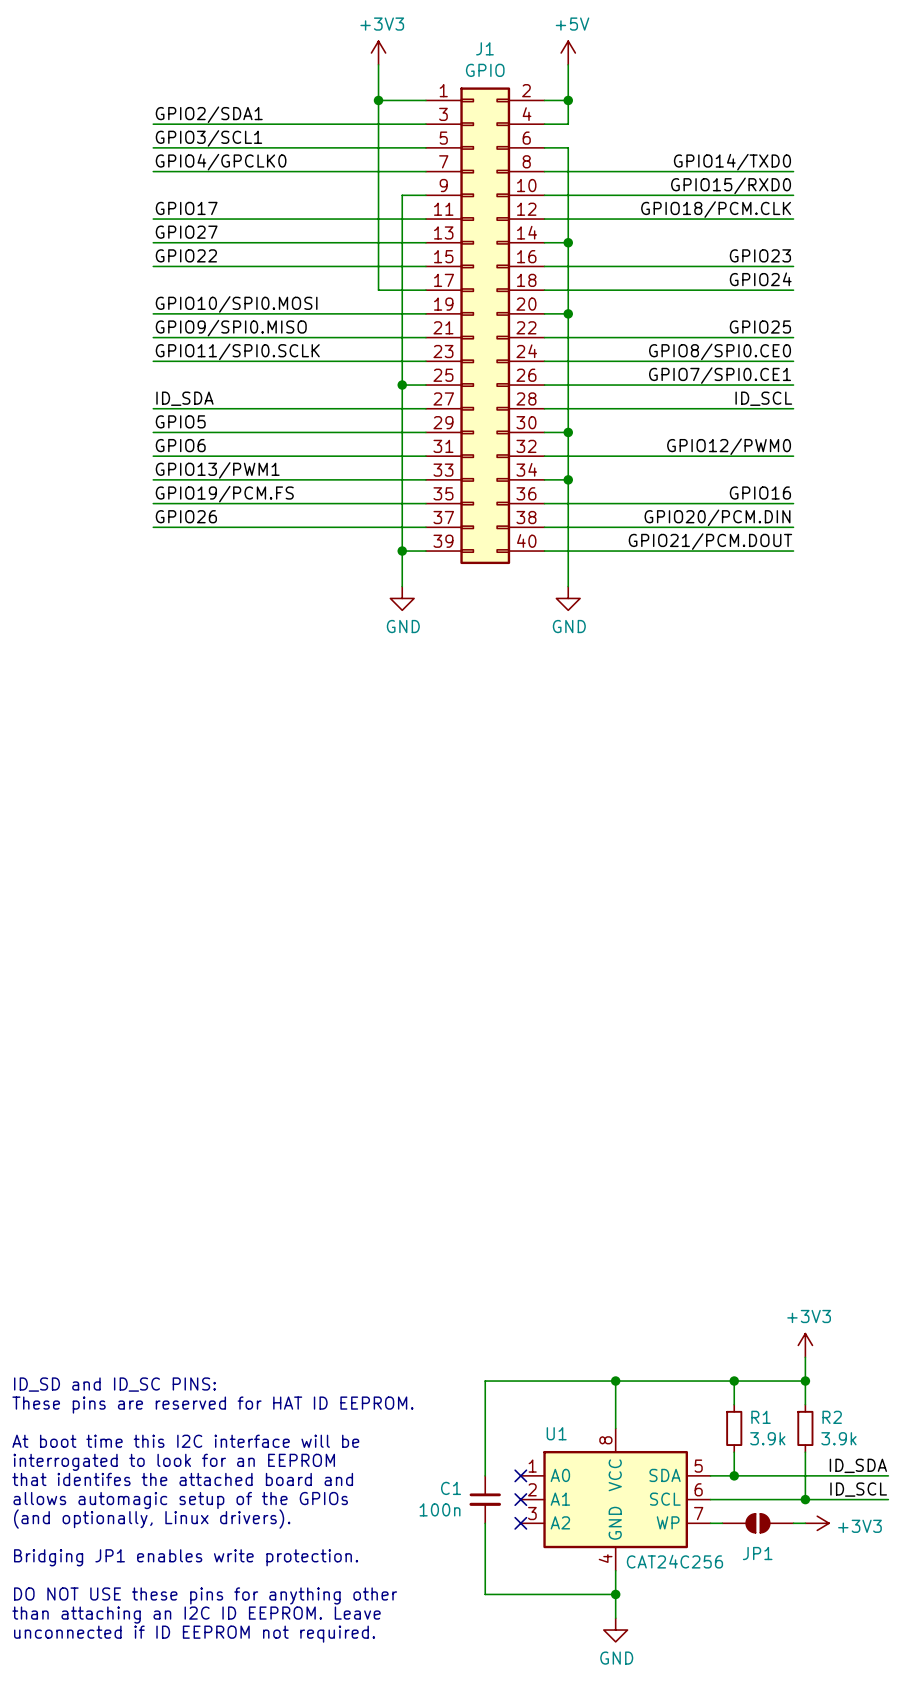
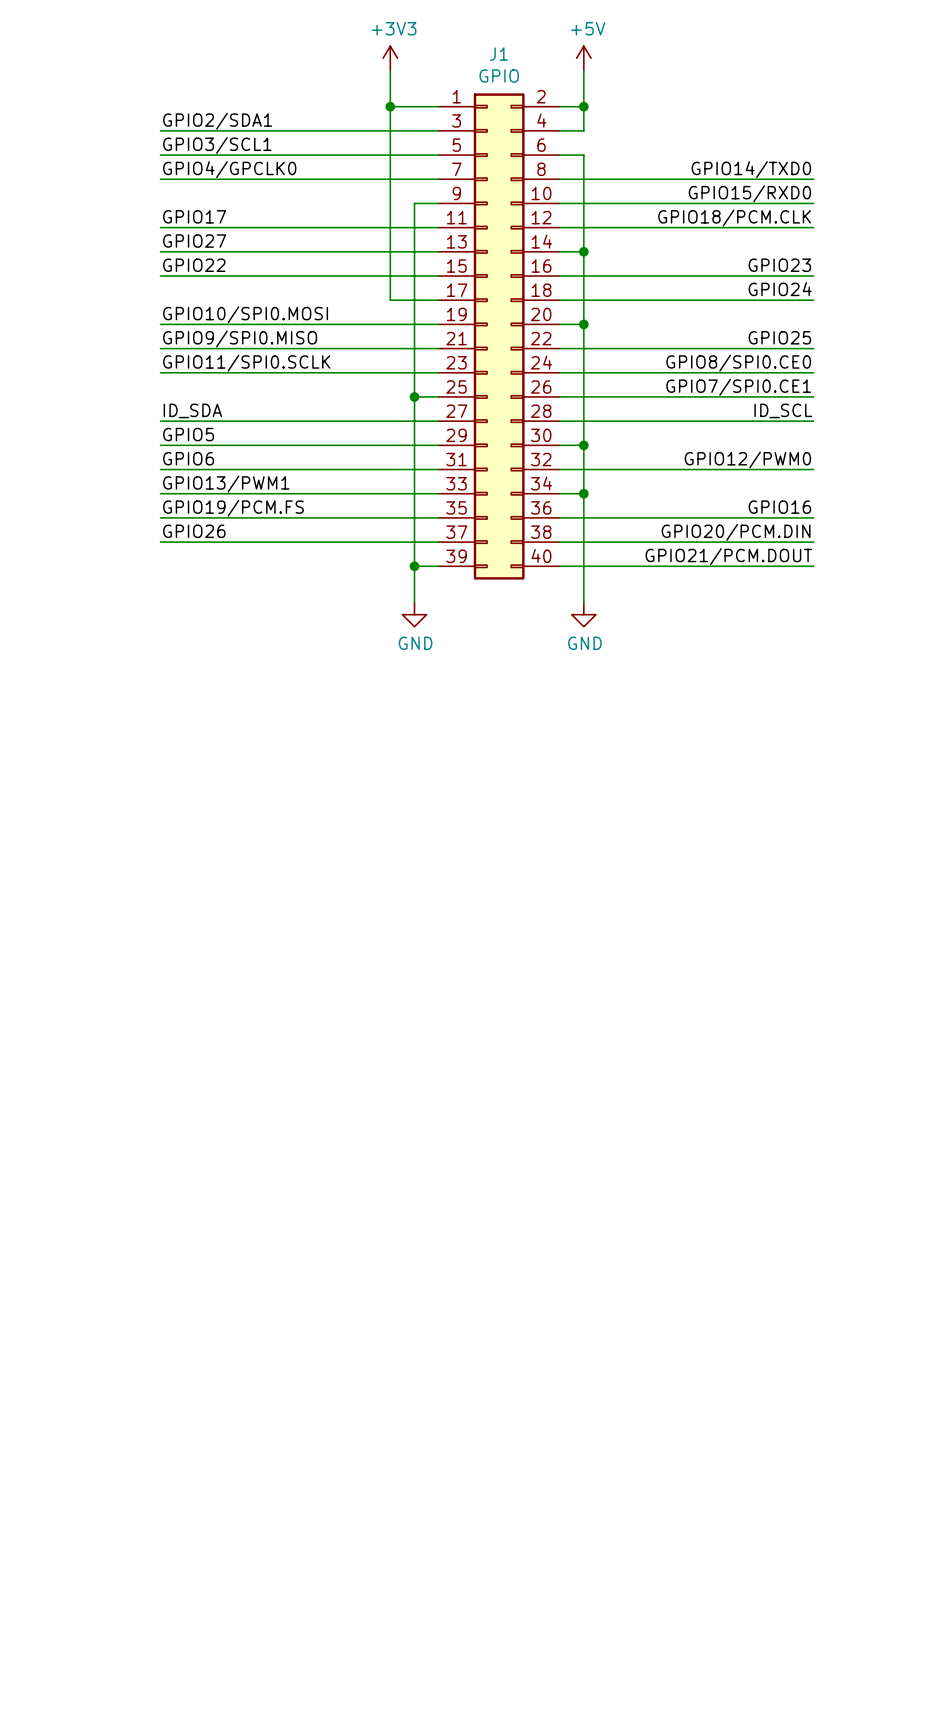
power symbol: +3V3 (805, 1345) -> none
wire: (805, 1357) (805, 1404) -> none
wire: (615, 1381) (615, 1428) -> none
junction: (615, 1381) -> none
wire: (734, 1381) (734, 1404) -> none
junction: (734, 1381) -> none
wire: (805, 1381) (485, 1381) (485, 1475) -> none
junction: (805, 1381) -> none
text: ID_SD and ID_SC PINS: (114, 1384) -> none
text: These pins are reserved for HAT ID EEPROM. (212, 1405) -> none
R1: 3.9k (734, 1428) -> none
R2: 3.9k (805, 1428) -> none
text: At boot time this I2C interface will be (185, 1441) -> none
wire: (734, 1452) (734, 1475) -> none
wire: (805, 1452) (805, 1499) -> none
text: interrogated to look for an EEPROM (174, 1462) -> none
label: ID_SDA (858, 1465) -> none
no-connect mark: (520, 1475) -> none
wire: (710, 1475) (888, 1475) -> none
junction: (734, 1475) -> none
text: that identifes the attached board and (182, 1479) -> none
label: ID_SCL (858, 1489) -> none
C1: 100n (485, 1499) -> none
no-connect mark: (520, 1499) -> none
U1: CAT24C256 (615, 1499) -> none
wire: (710, 1499) (888, 1499) -> none
junction: (805, 1499) -> none
text: allows automagic setup of the GPIOs (180, 1500) -> none
text: (and optionally, Linux drivers). (152, 1519) -> none
wire: (485, 1523) (485, 1594) (615, 1594) -> none
no-connect mark: (520, 1523) -> none
wire: (710, 1523) (722, 1523) -> none
JP1: (757, 1523) -> none
wire: (793, 1523) (805, 1523) -> none
power symbol: +3V3 (817, 1523) -> none
text: Bridging JP1 enables write protection. (186, 1557) -> none
wire: (615, 1570) (615, 1618) -> none
junction: (615, 1594) -> none
text: DO NOT USE these pins for anything other (205, 1595) -> none
text: than attaching an I2C ID EEPROM. Leave (196, 1615) -> none
power symbol: GND (615, 1630) -> none
text: unconnected if ID EEPROM not required. (194, 1634) -> none

